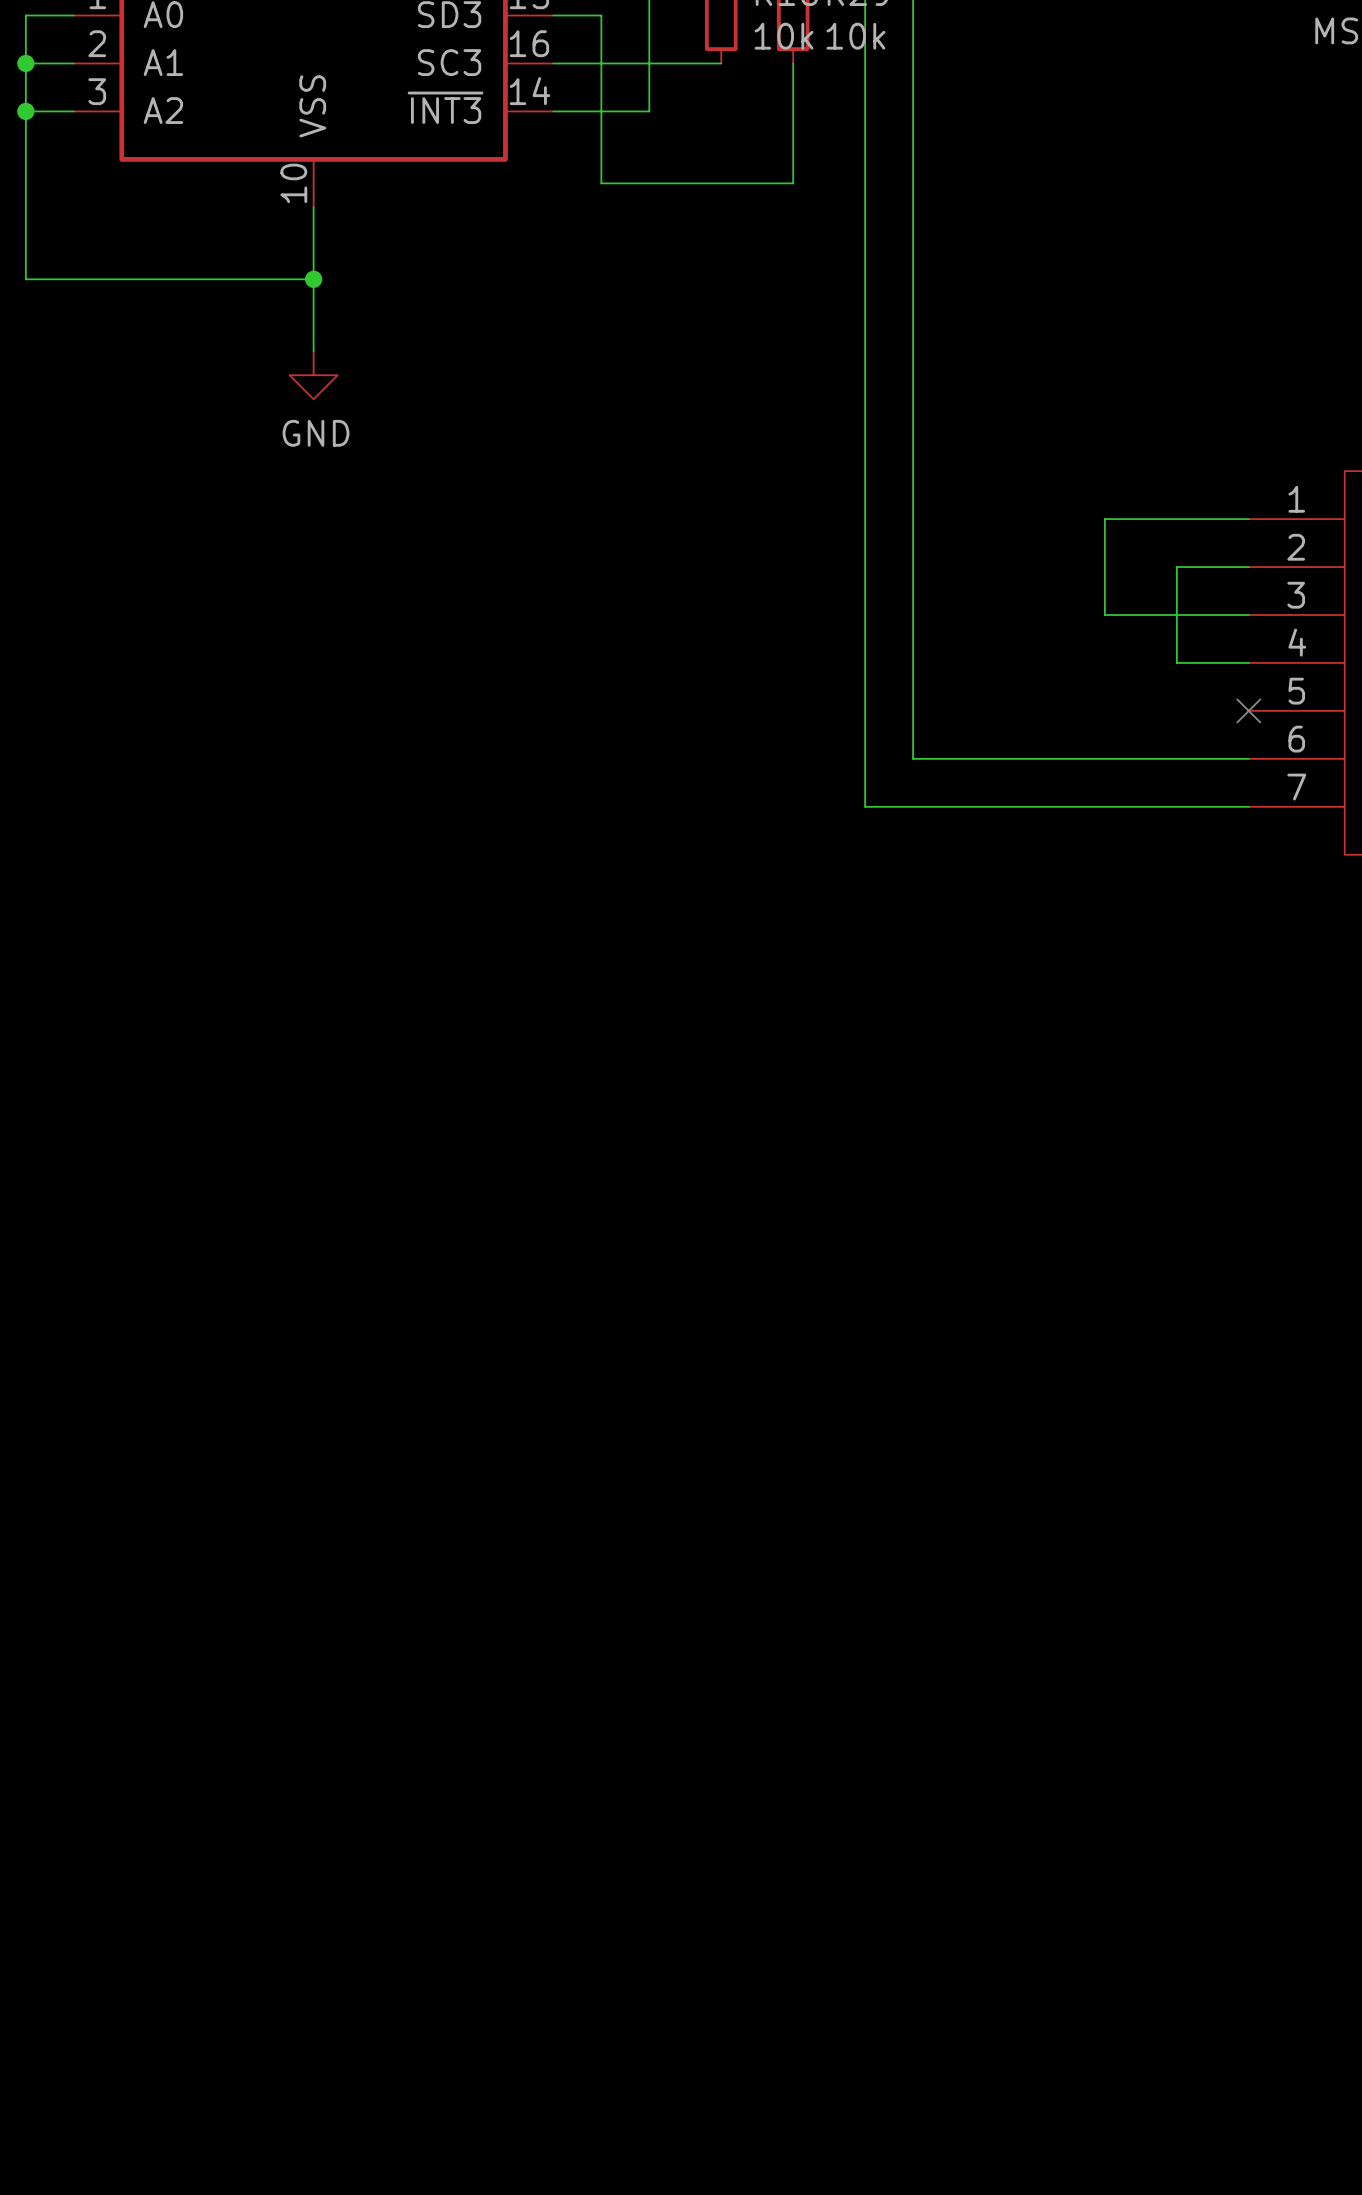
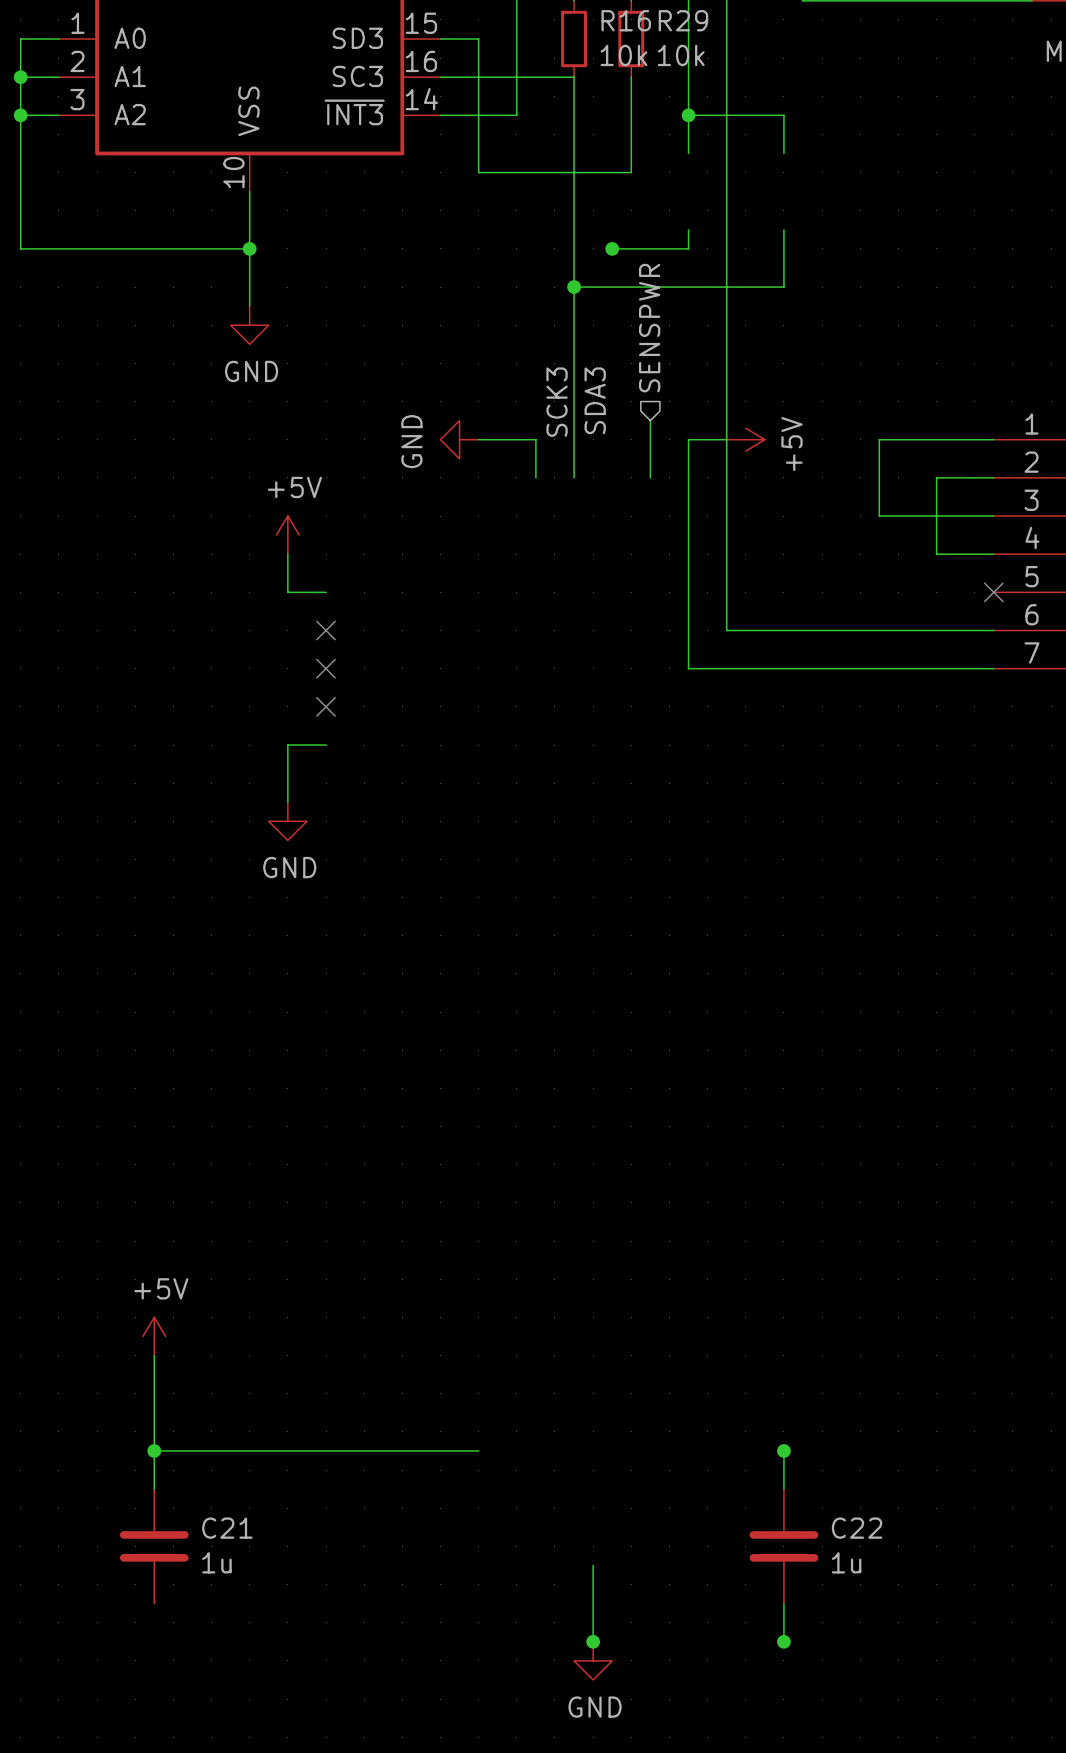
wire: none -> (574, 77) (574, 477)
wire: none -> (688, 115) (783, 115) (783, 153)
junction: none -> (688, 115)
wire: (865, 159) (865, 255) -> none
wire: none -> (783, 229) (783, 287) (574, 287)
wire: none -> (612, 248) (688, 248)
junction: none -> (612, 248)
wire: (865, 279) (865, 519) -> (726, 439) (688, 439)
junction: none -> (574, 287)
hierarchical label: none -> SENSPWR (649, 328)
label: none -> SDA3 (595, 400)
label: none -> SCK3 (557, 402)
wire: none -> (650, 420) (650, 477)
power symbol: none -> GND (459, 439)
wire: none -> (478, 439) (535, 439) (535, 477)
power symbol: none -> +5V (745, 439)
power symbol: none -> +5V (287, 535)
wire: none -> (287, 554) (287, 592) (326, 592)
no-connect mark: none -> (326, 630)
no-connect mark: none -> (326, 668)
no-connect mark: none -> (326, 706)
wire: none -> (326, 745) (287, 745) (287, 802)
power symbol: none -> GND (287, 821)
power symbol: none -> +5V (154, 1336)
wire: none -> (154, 1355) (154, 1489)
wire: none -> (154, 1450) (478, 1450)
junction: none -> (154, 1450)
wire: none -> (783, 1450) (783, 1489)
junction: none -> (783, 1450)
C21: none -> 1u (154, 1546)
C22: none -> 1u (783, 1546)
wire: none -> (593, 1565) (593, 1641)
wire: none -> (783, 1603) (783, 1641)
junction: none -> (593, 1641)
junction: none -> (783, 1641)
power symbol: none -> GND (593, 1660)

